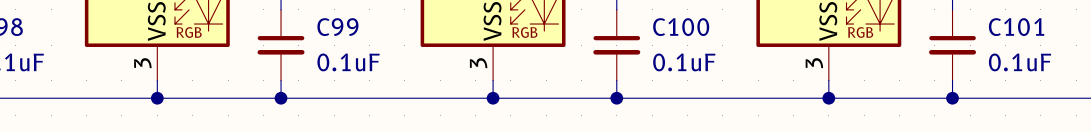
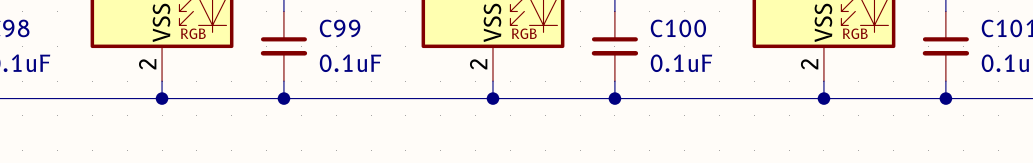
part pin number: 3 (142, 63) -> 2 (147, 64)
part pin number: 3 (478, 63) -> 2 (478, 64)
part pin number: 3 (814, 63) -> 2 (809, 64)

